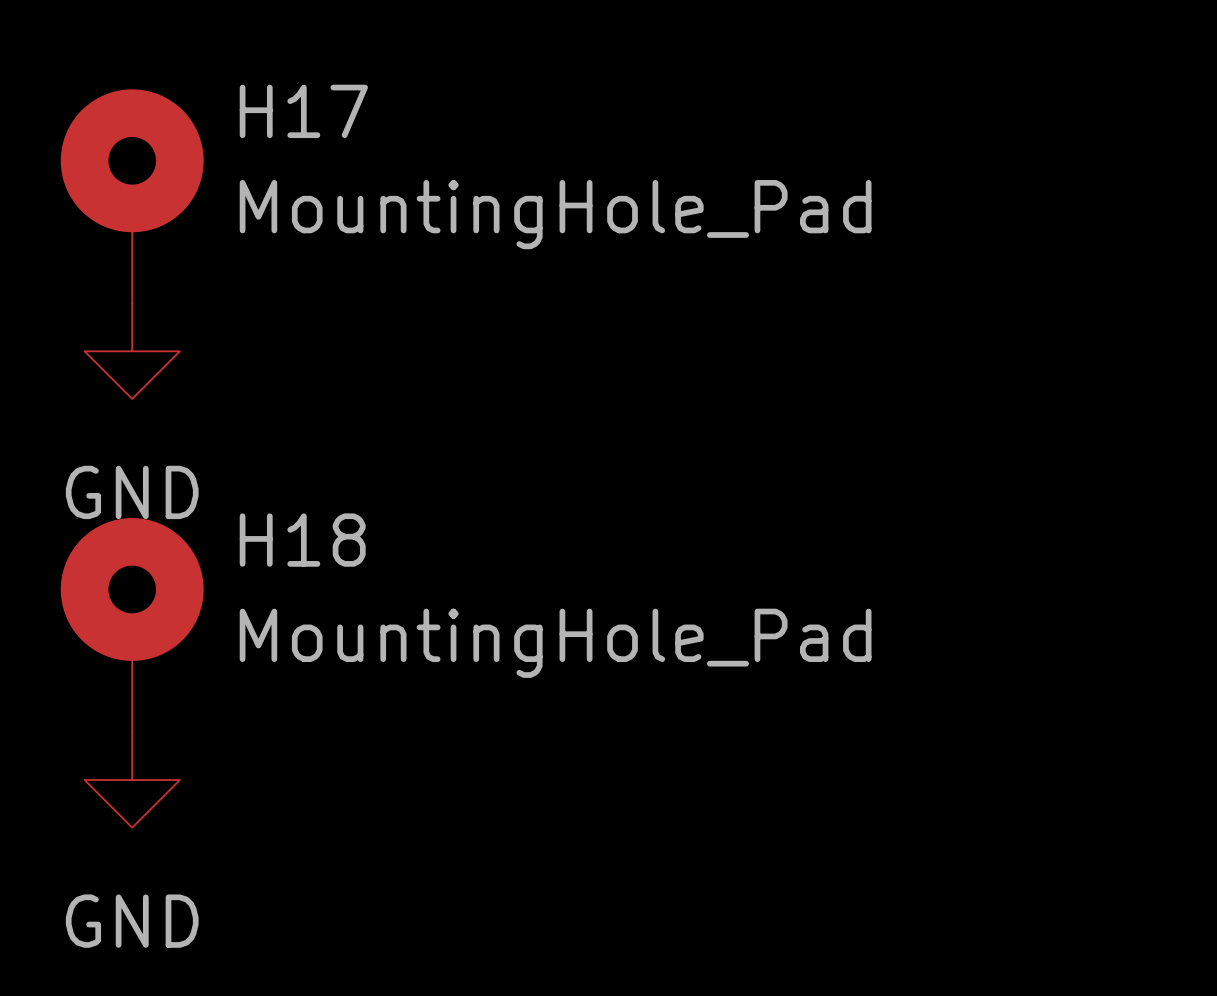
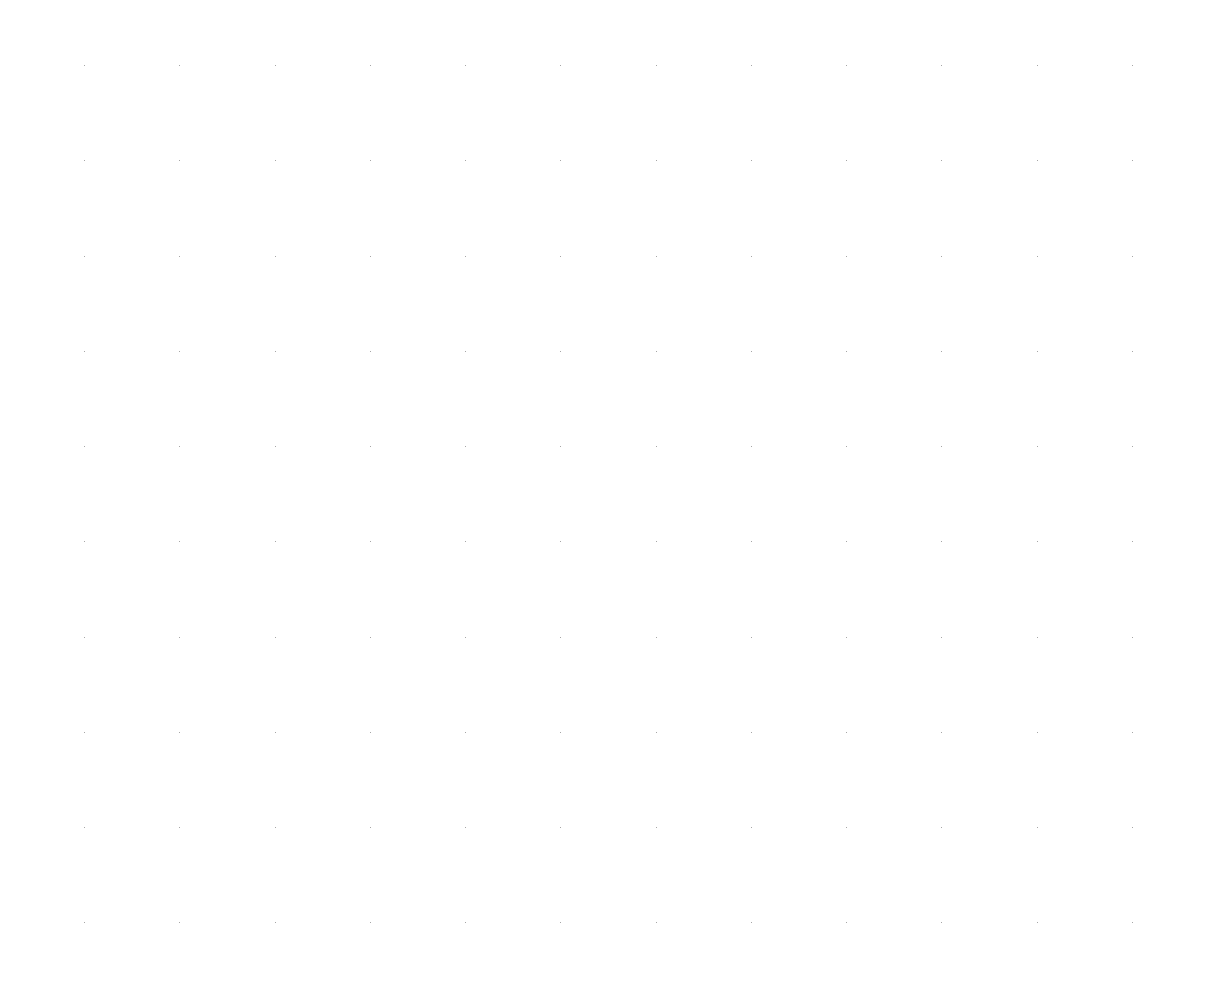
H17: MountingHole_Pad (132, 196) -> none
power symbol: GND (132, 351) -> none
H18: MountingHole_Pad (132, 625) -> none
power symbol: GND (132, 780) -> none

